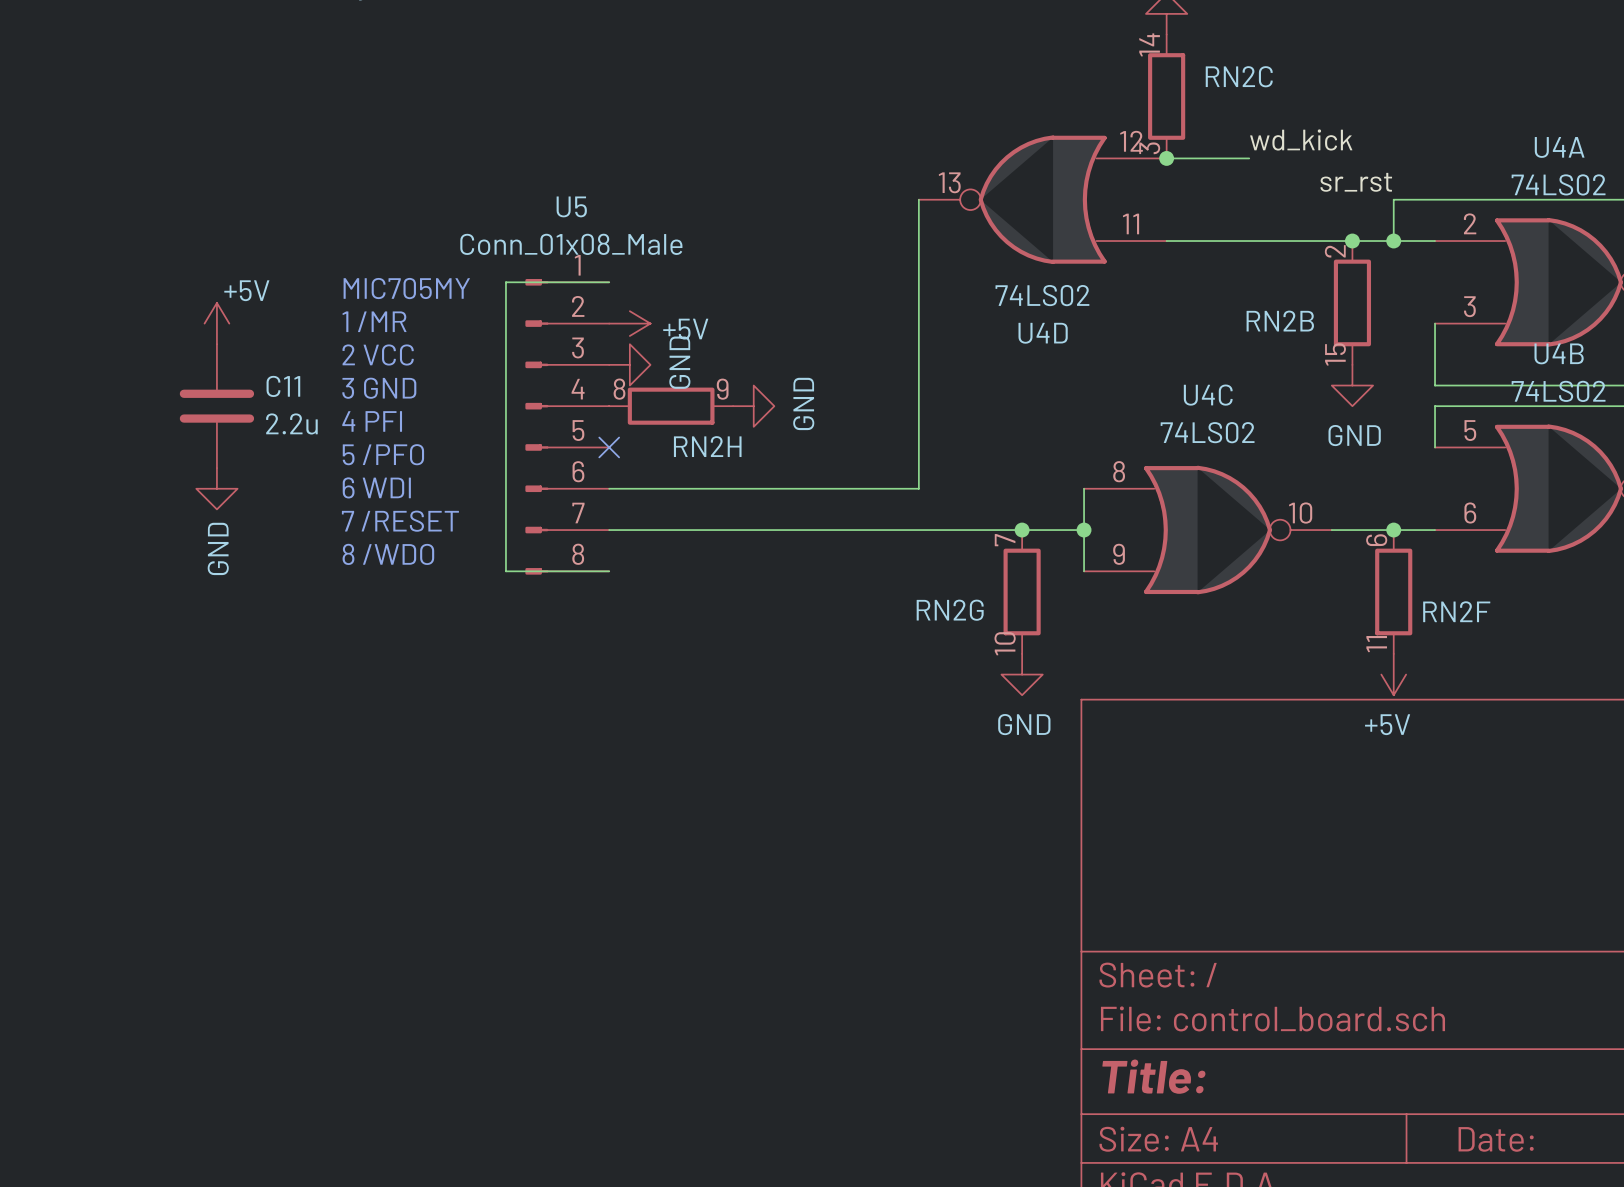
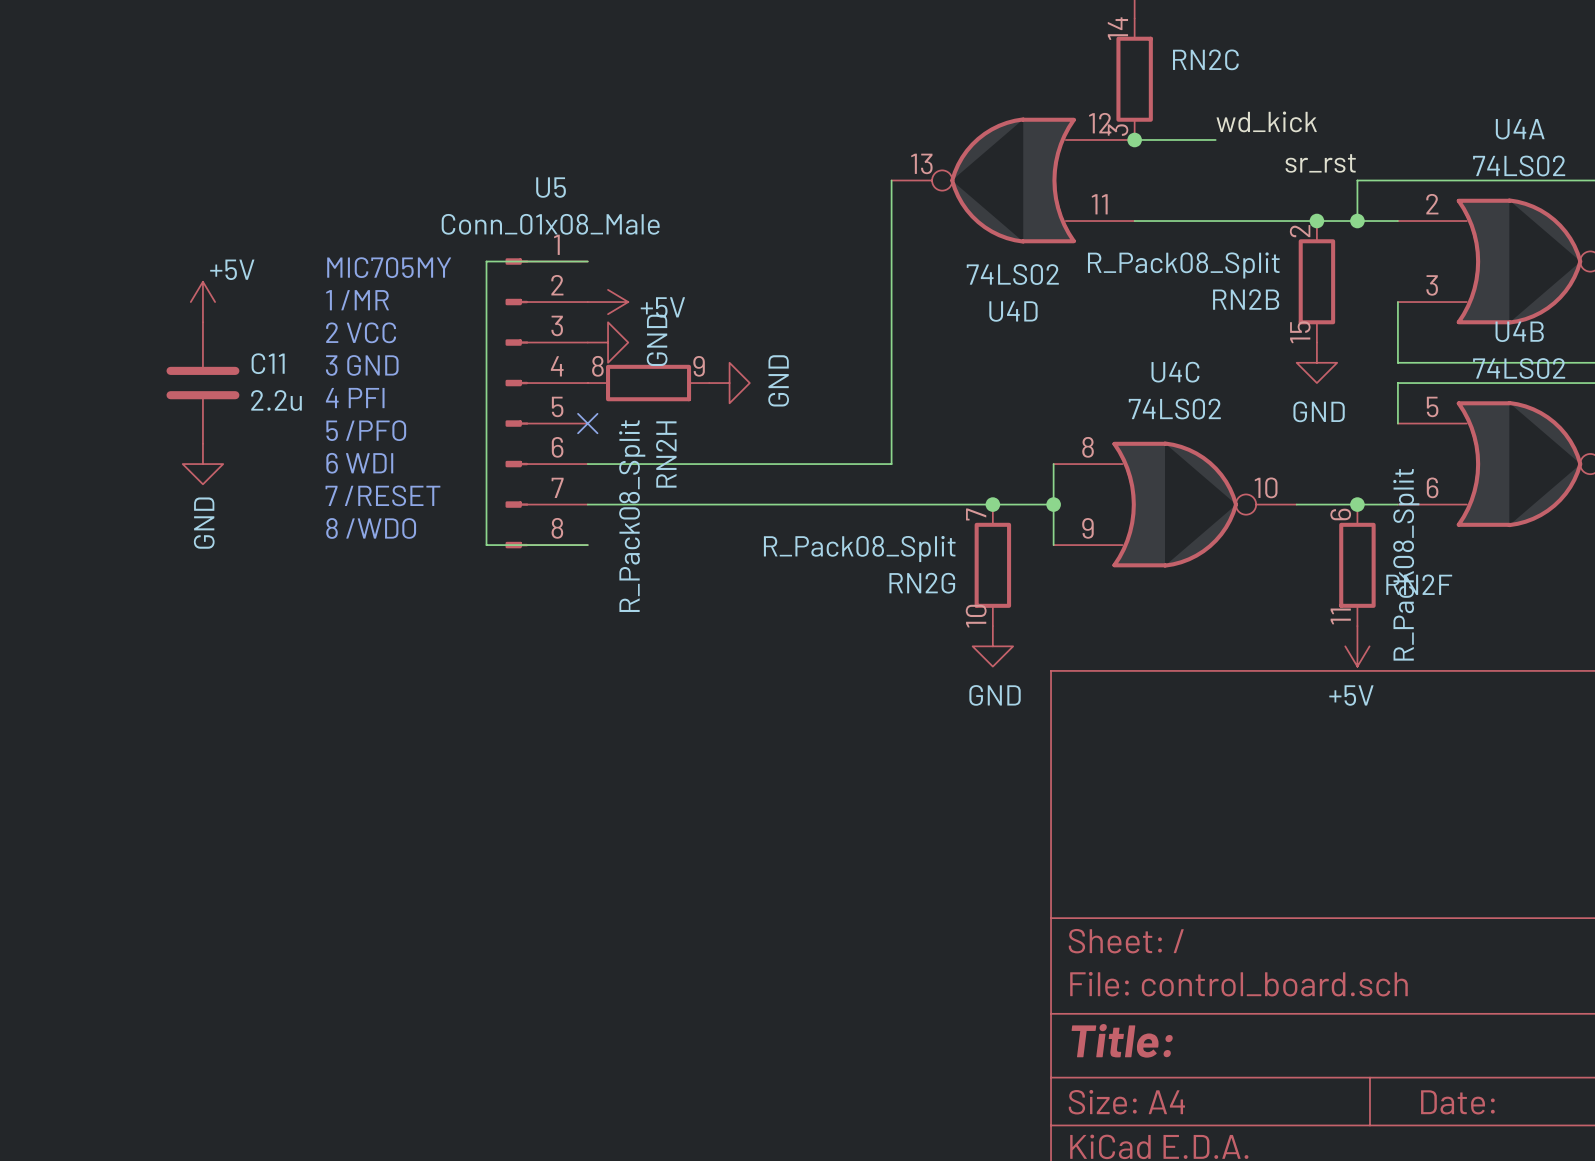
RN2B value: none -> R_Pack08_Split (1183, 265)
RN2H name rotation: 0° (707, 446) -> 90° counterclockwise (666, 454)
RN2H value: none -> R_Pack08_Split (632, 516)
RN2G value: none -> R_Pack08_Split (859, 549)
RN2F value: none -> R_Pack08_Split (1406, 564)

